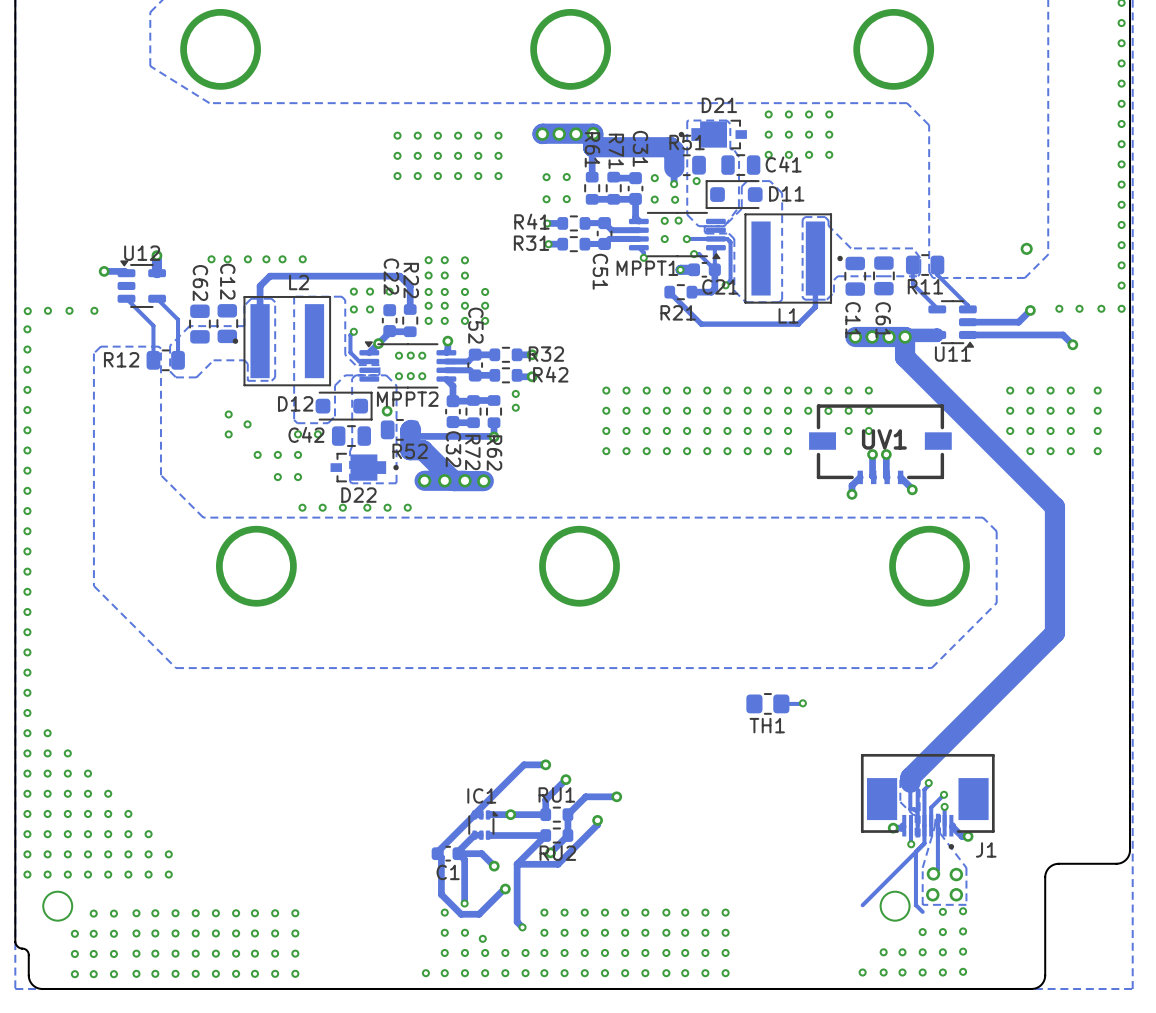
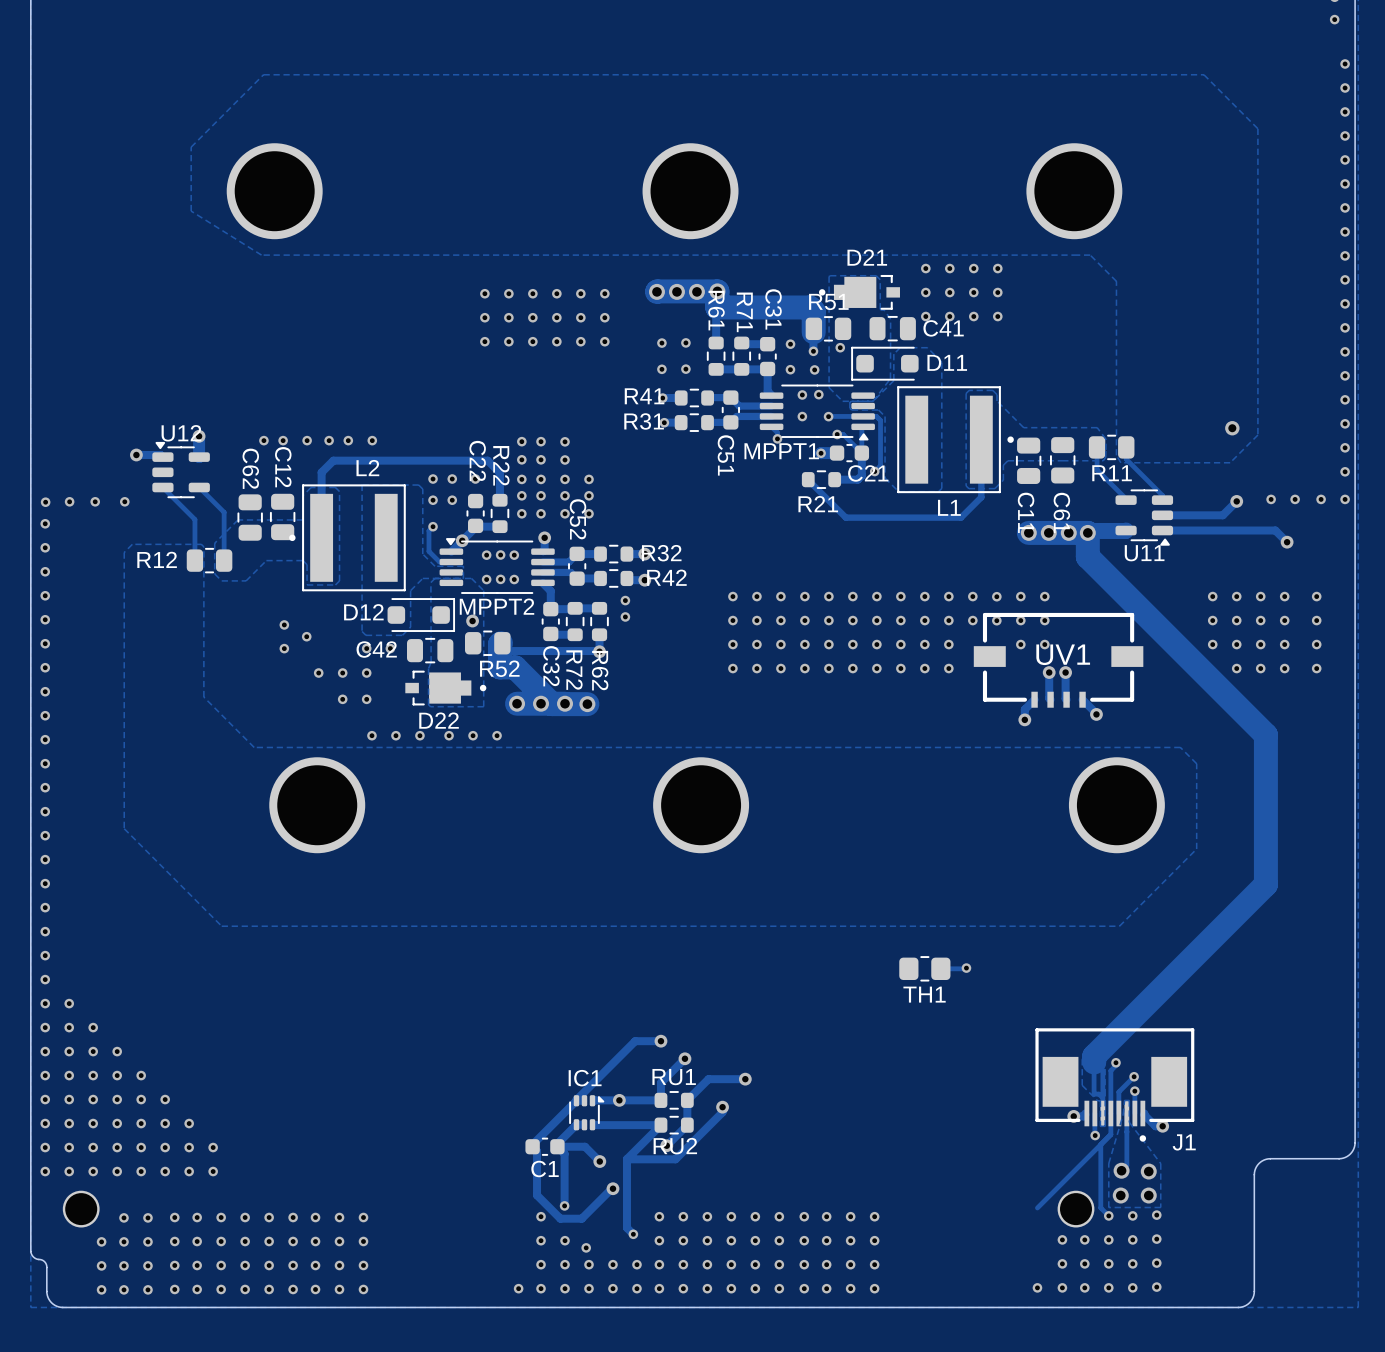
via: none -> (1108, 1215)
via: none -> (1062, 1239)
via: none -> (1084, 1239)

